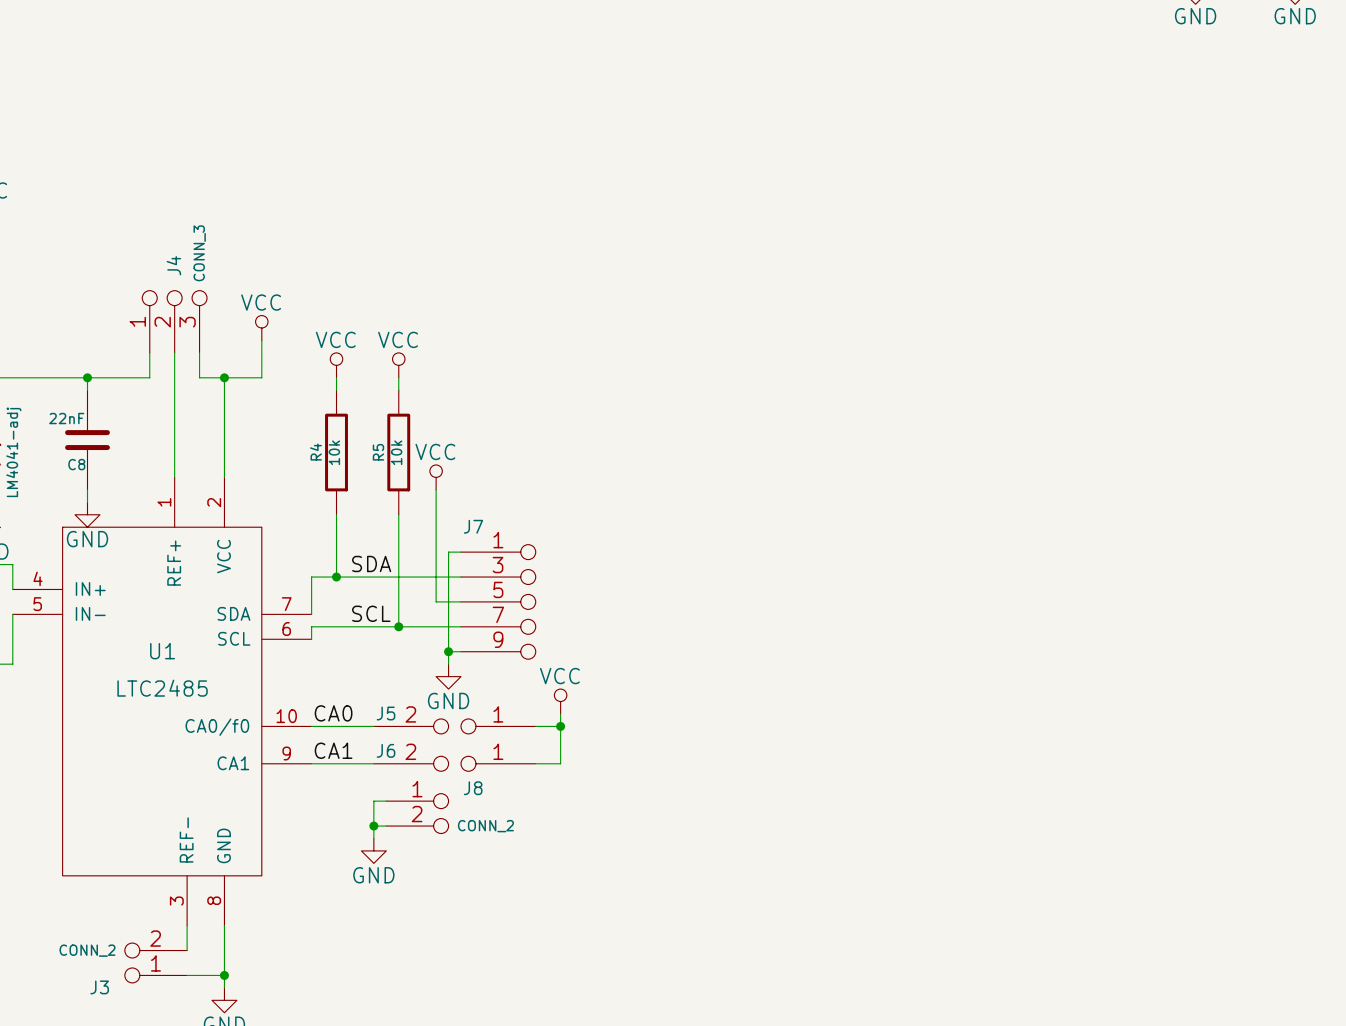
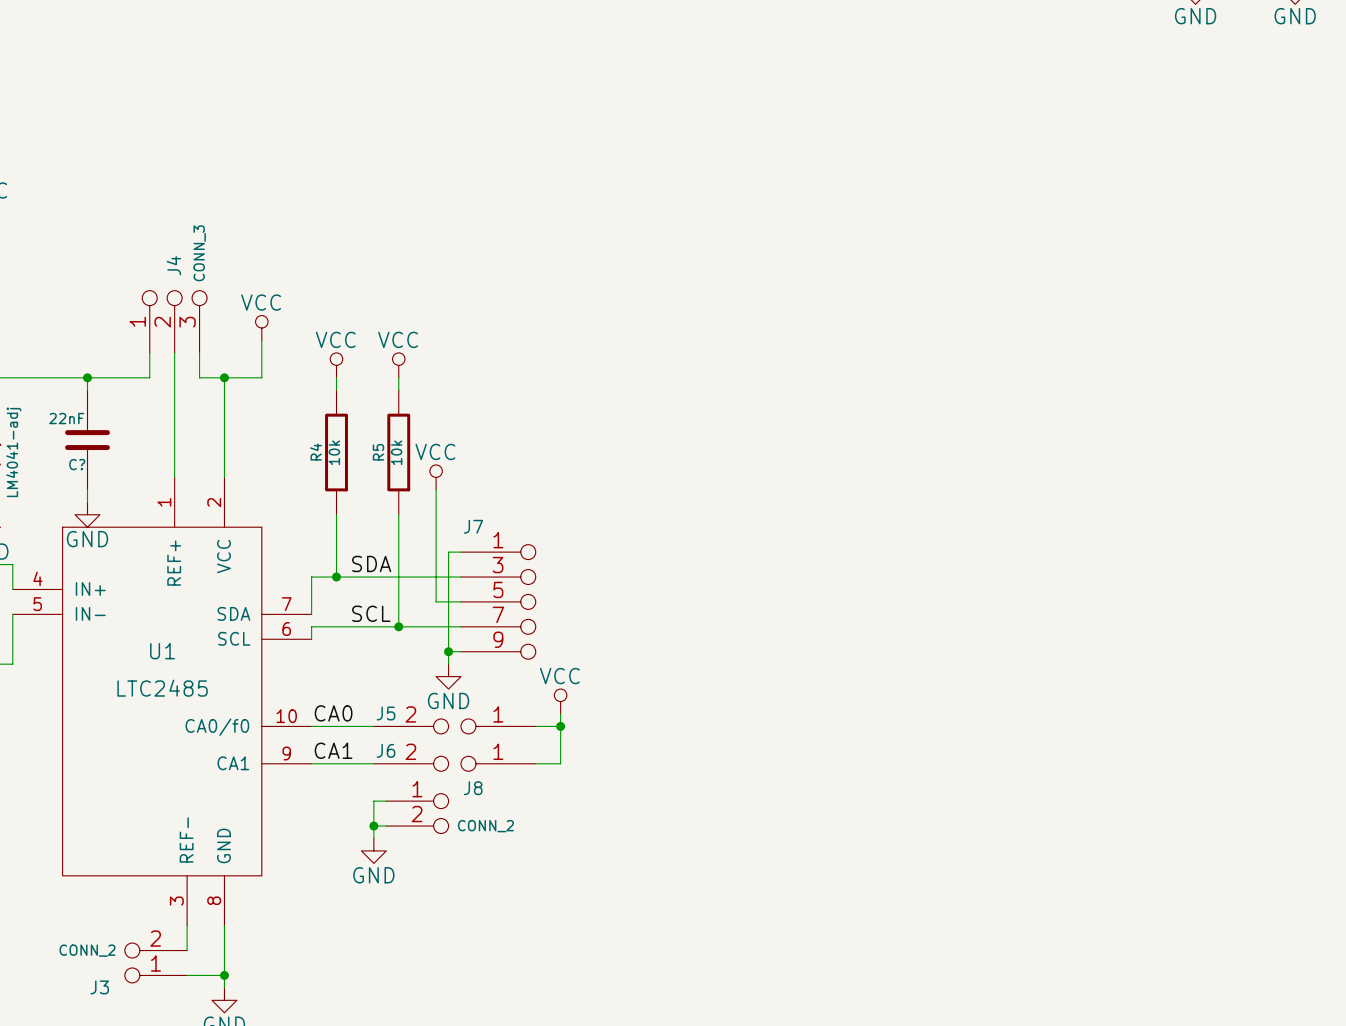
C8 name: C8 (76, 464) -> C? (77, 464)

